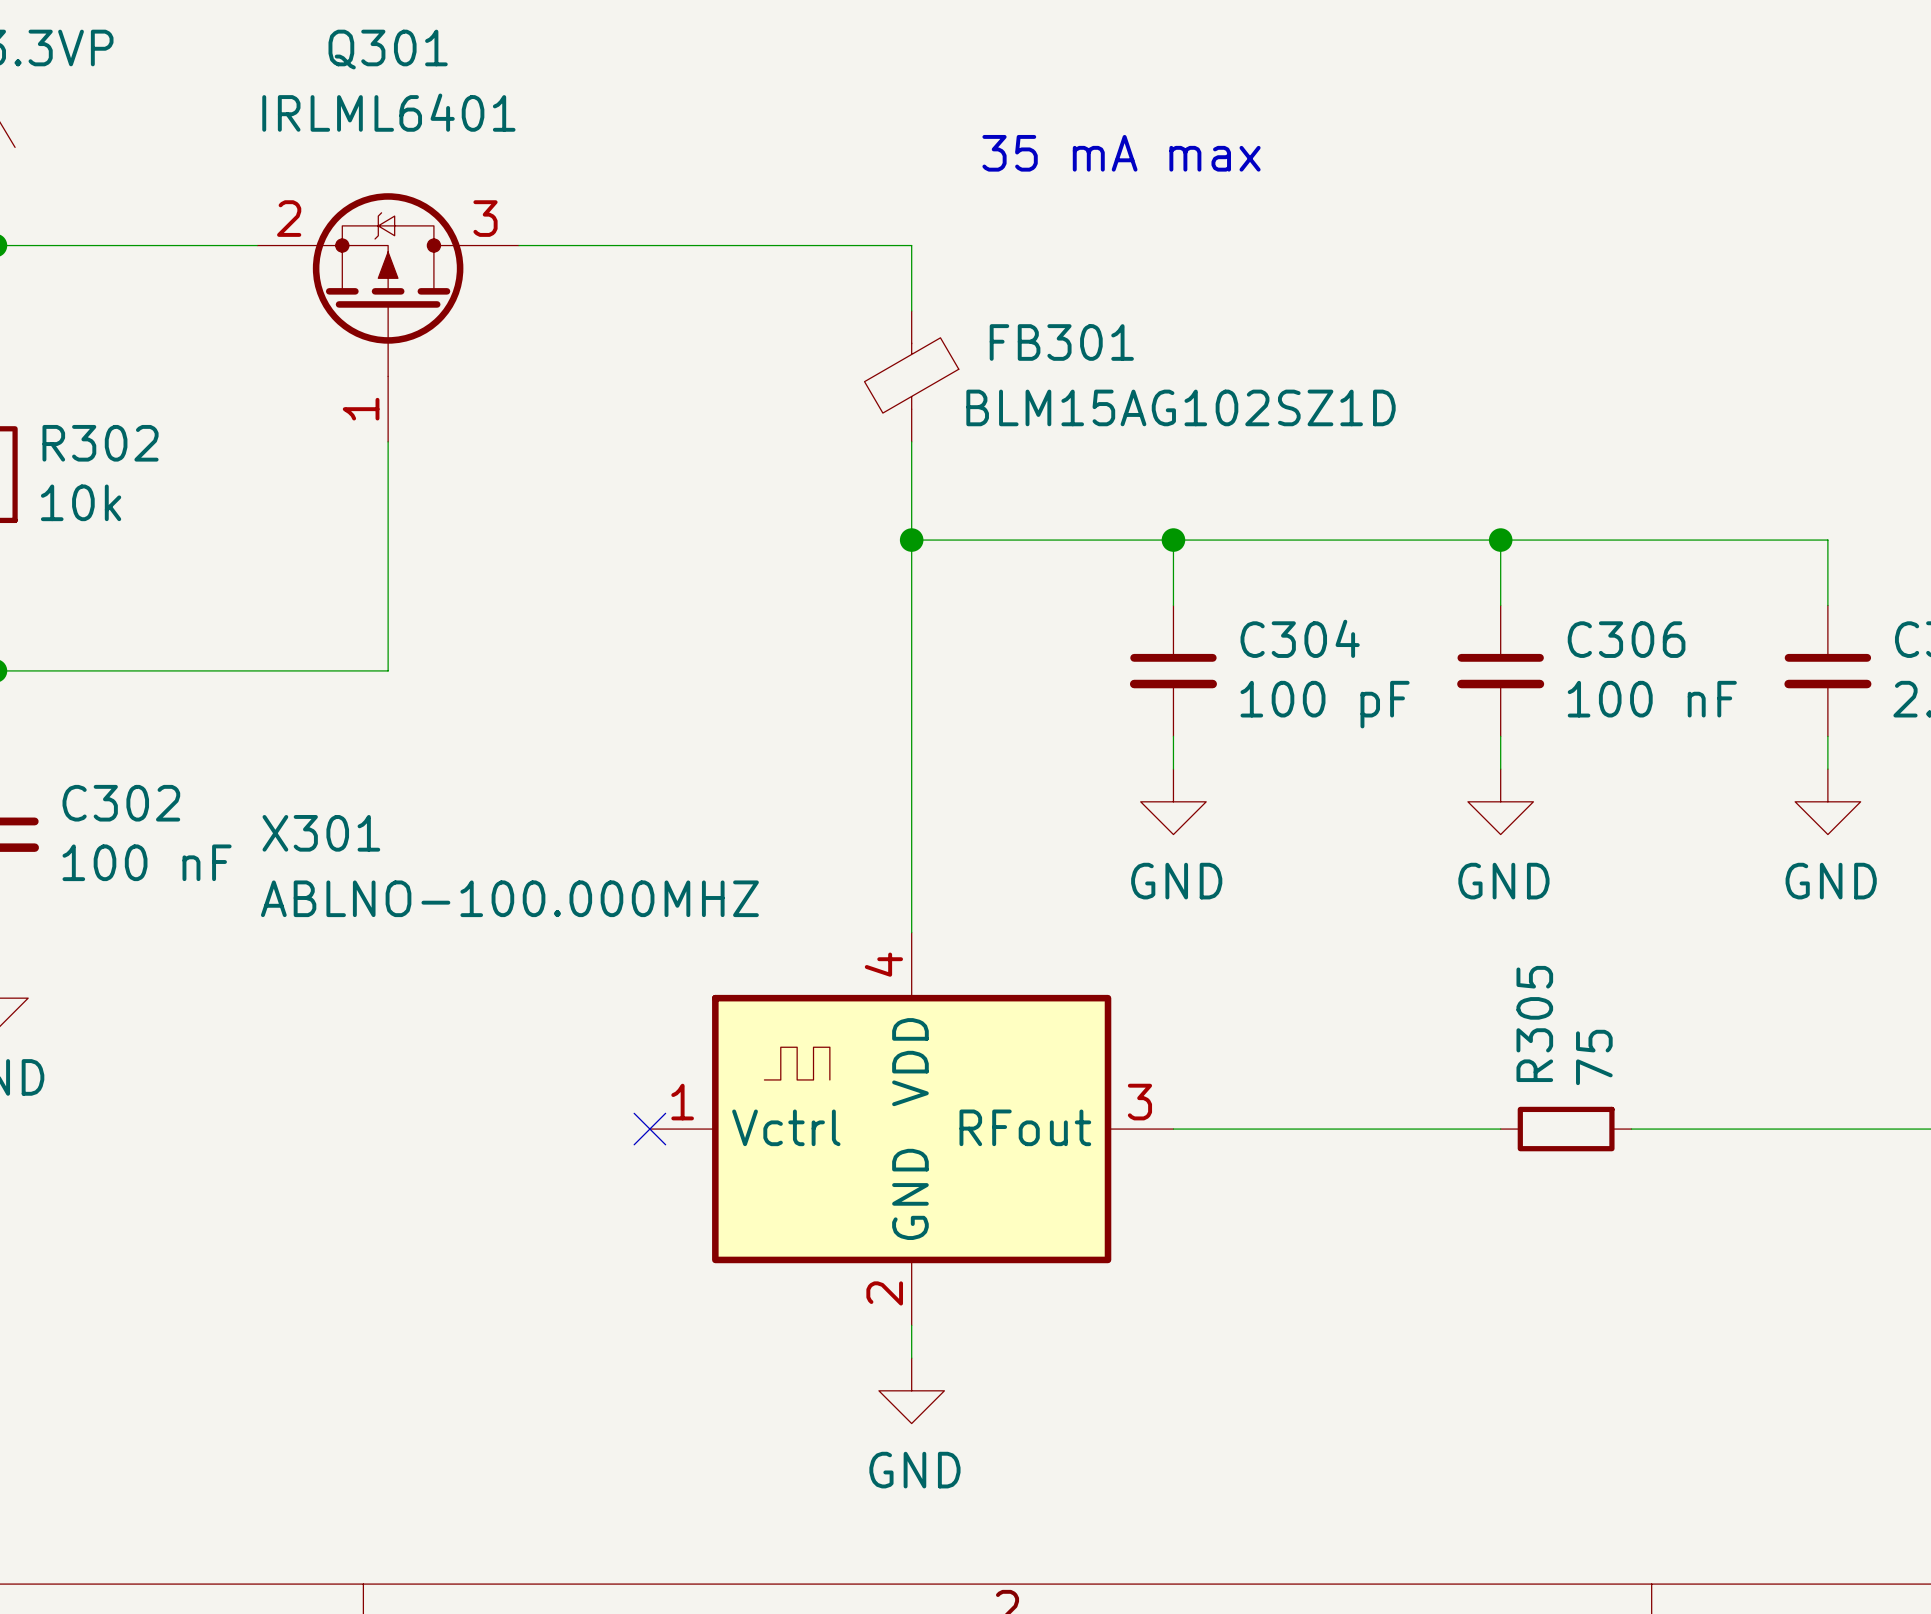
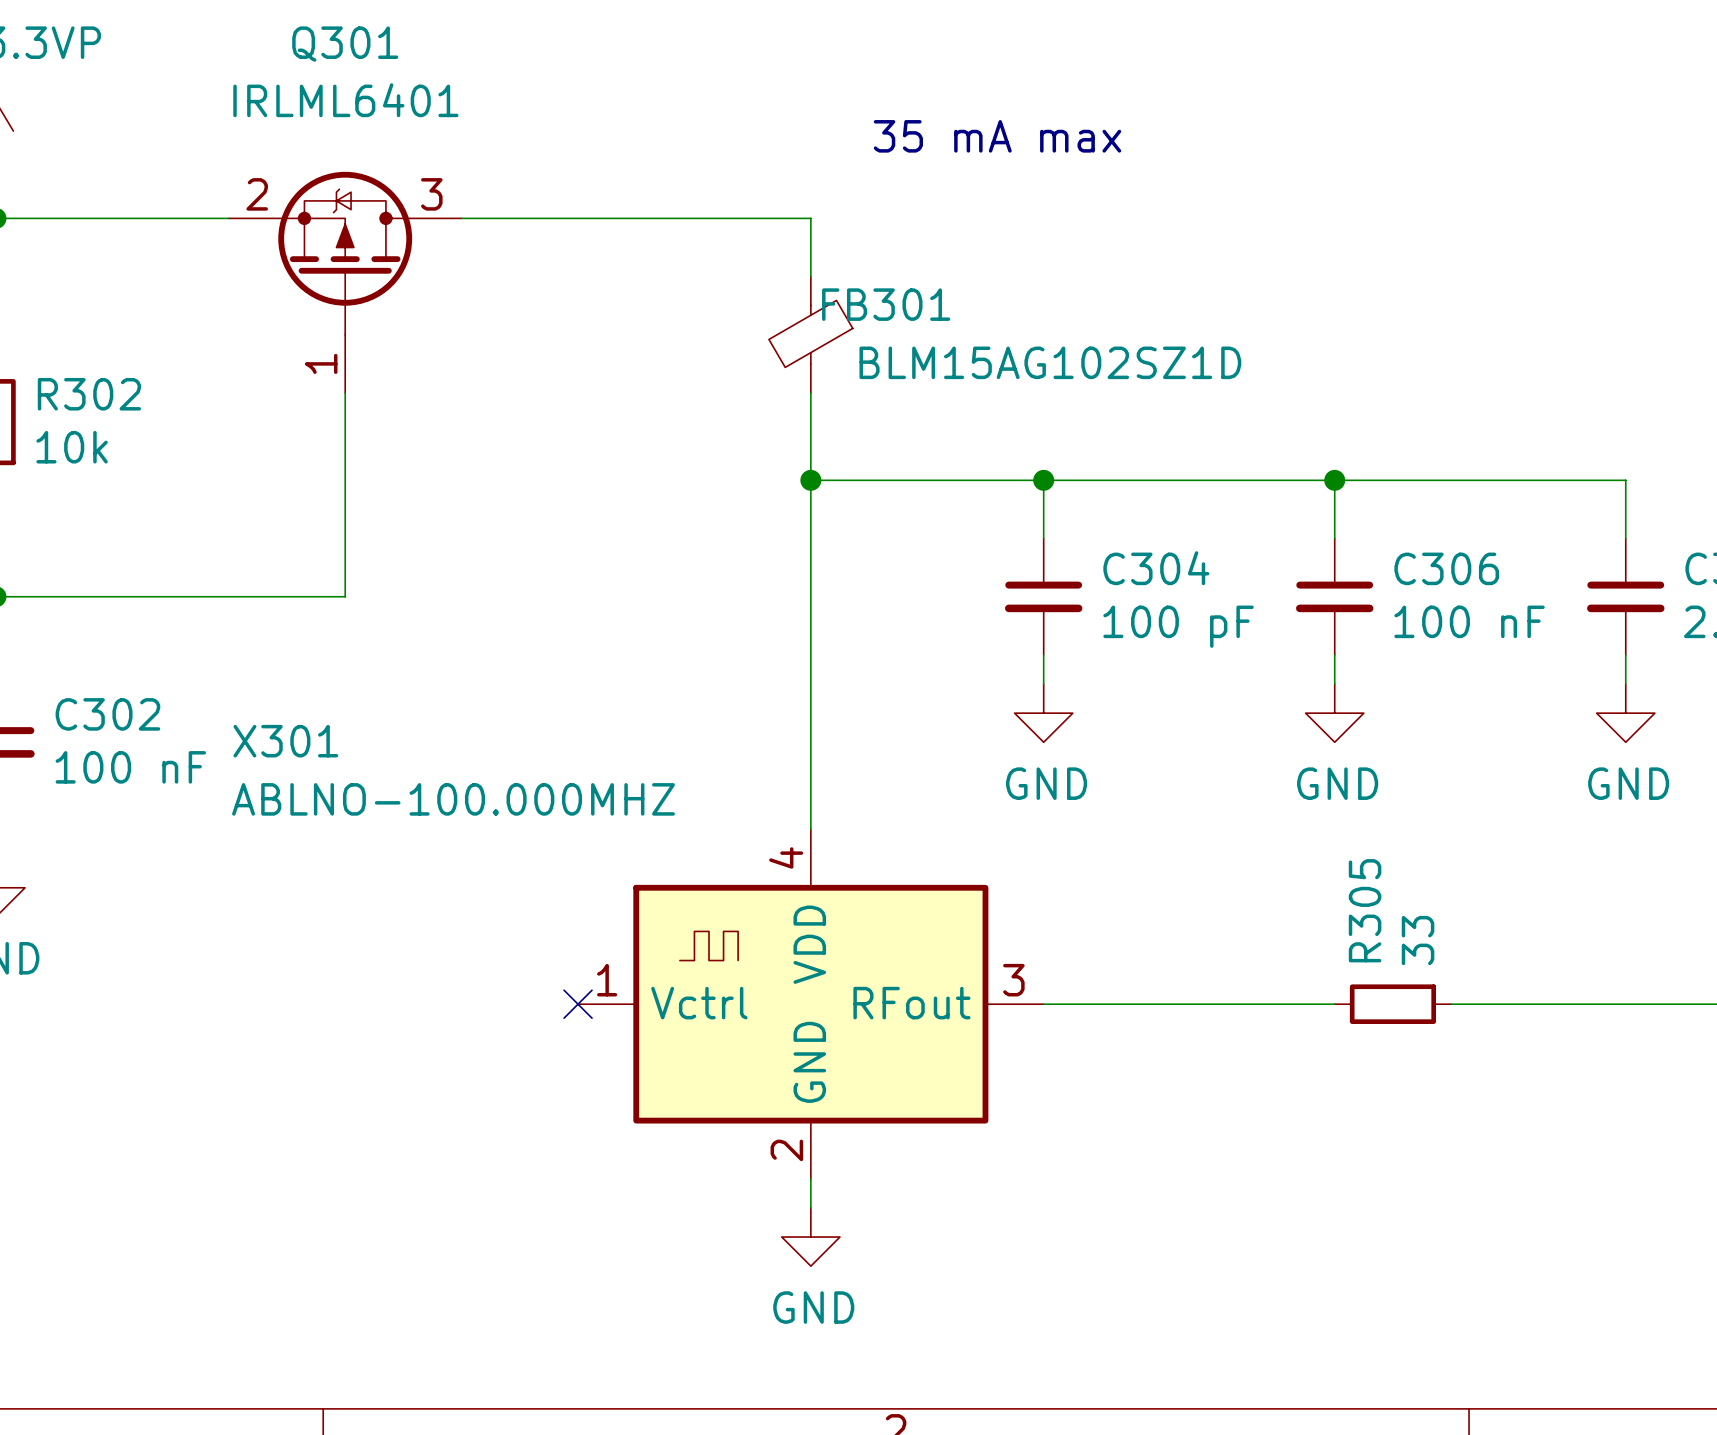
FB301 name position: FB301 (1061, 342) -> FB301 (886, 304)
R305 value: 75 (1594, 1057) -> 33 (1418, 940)

